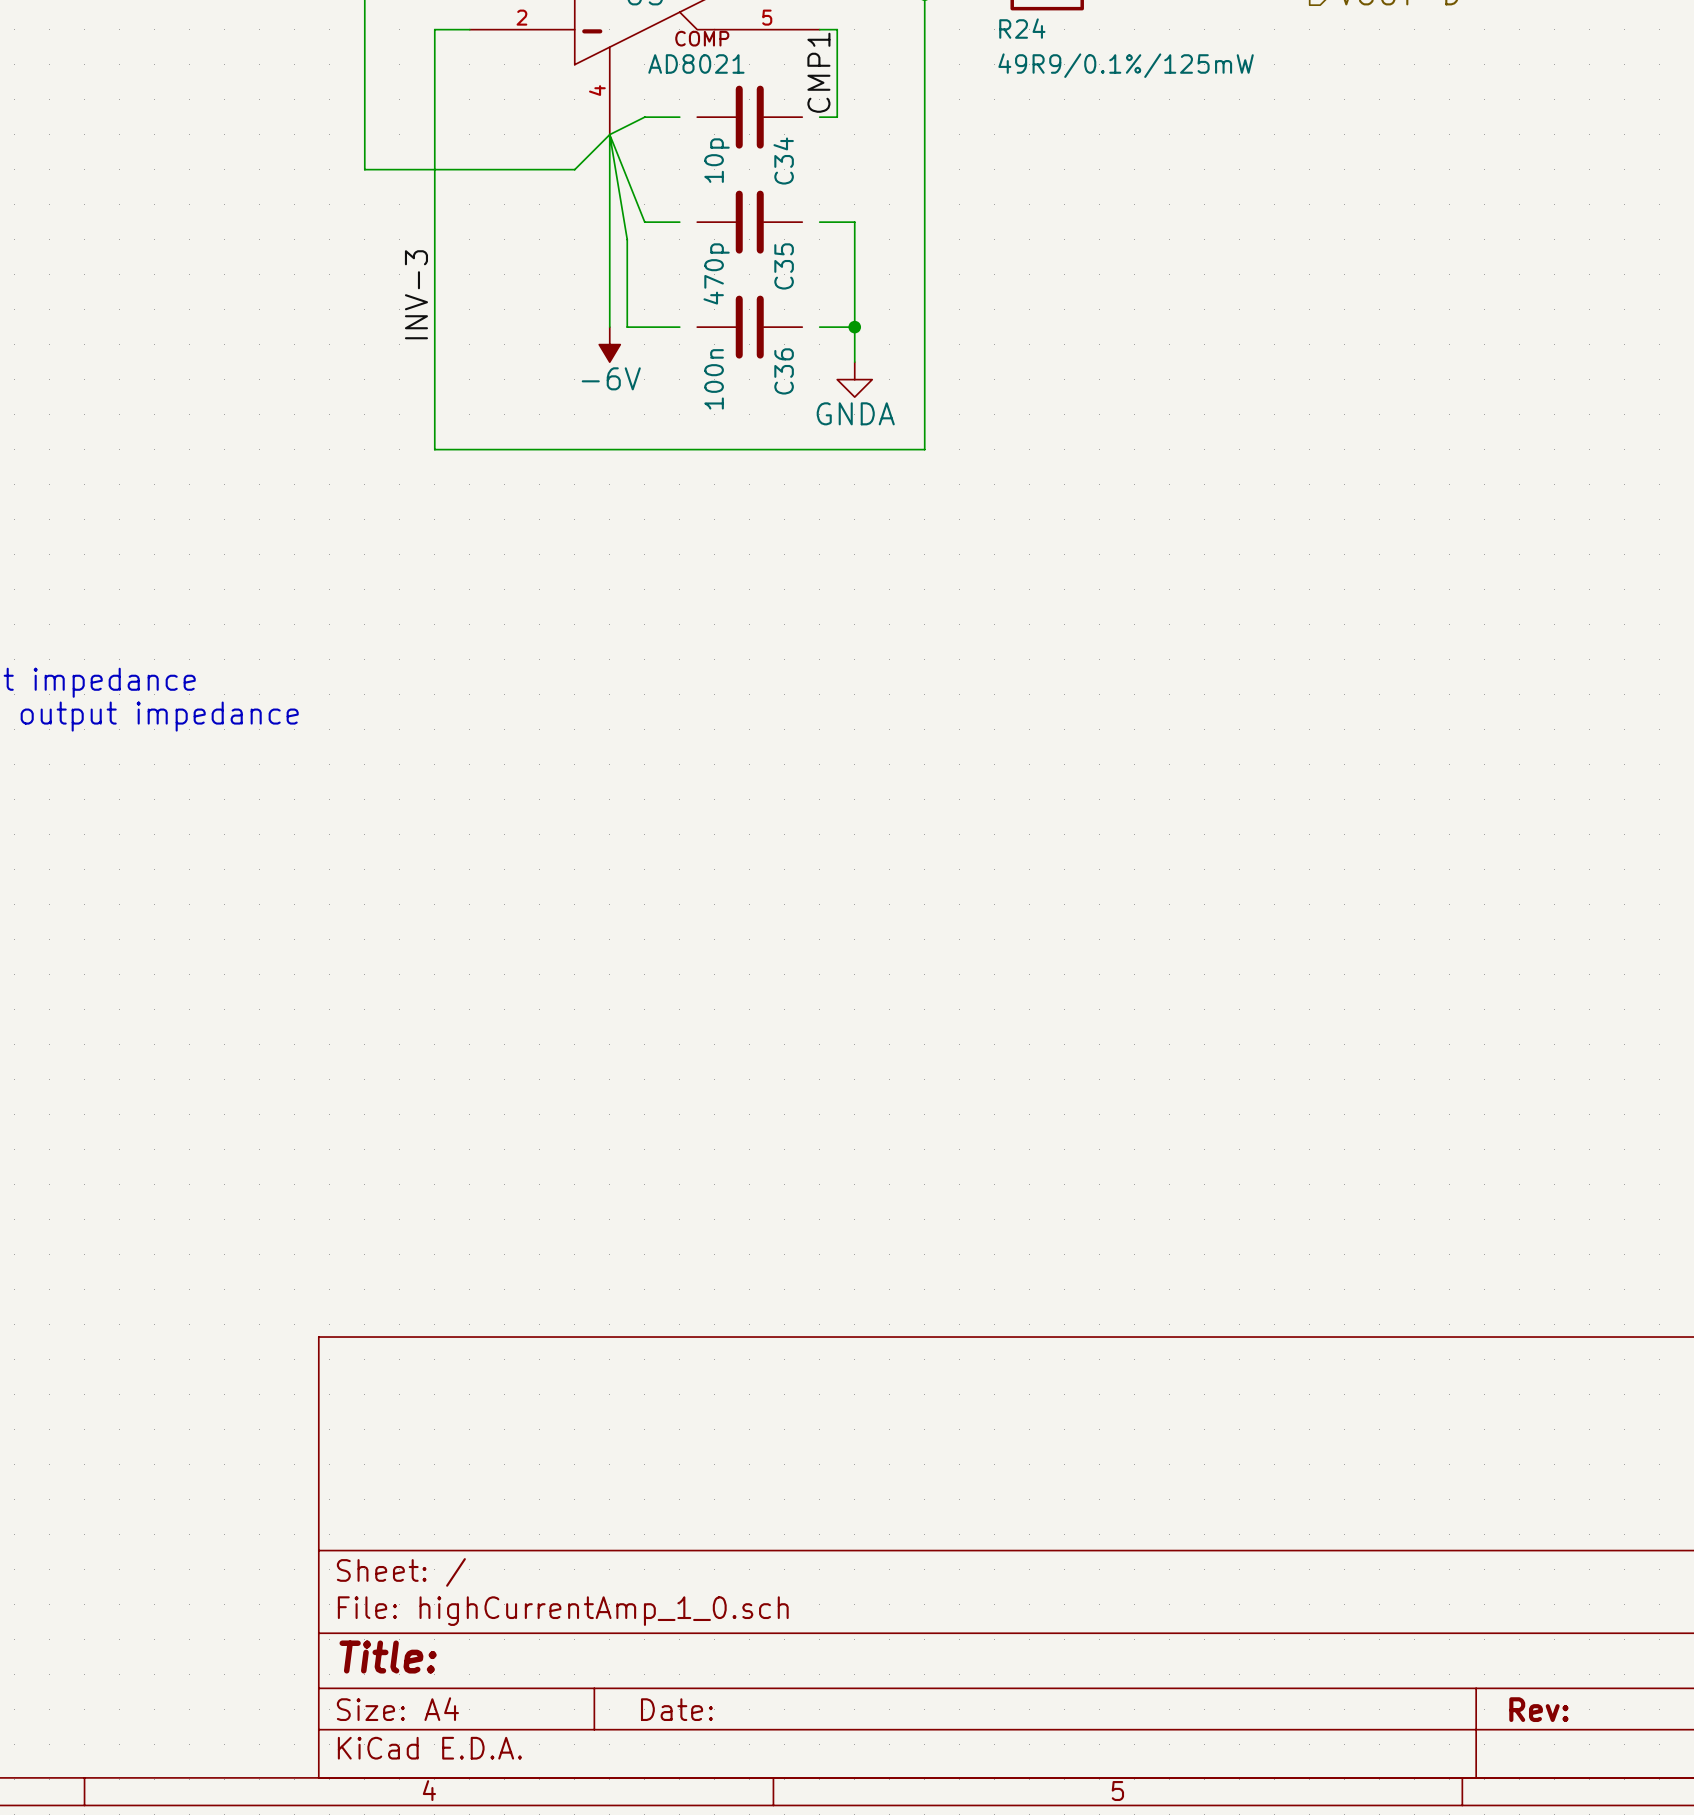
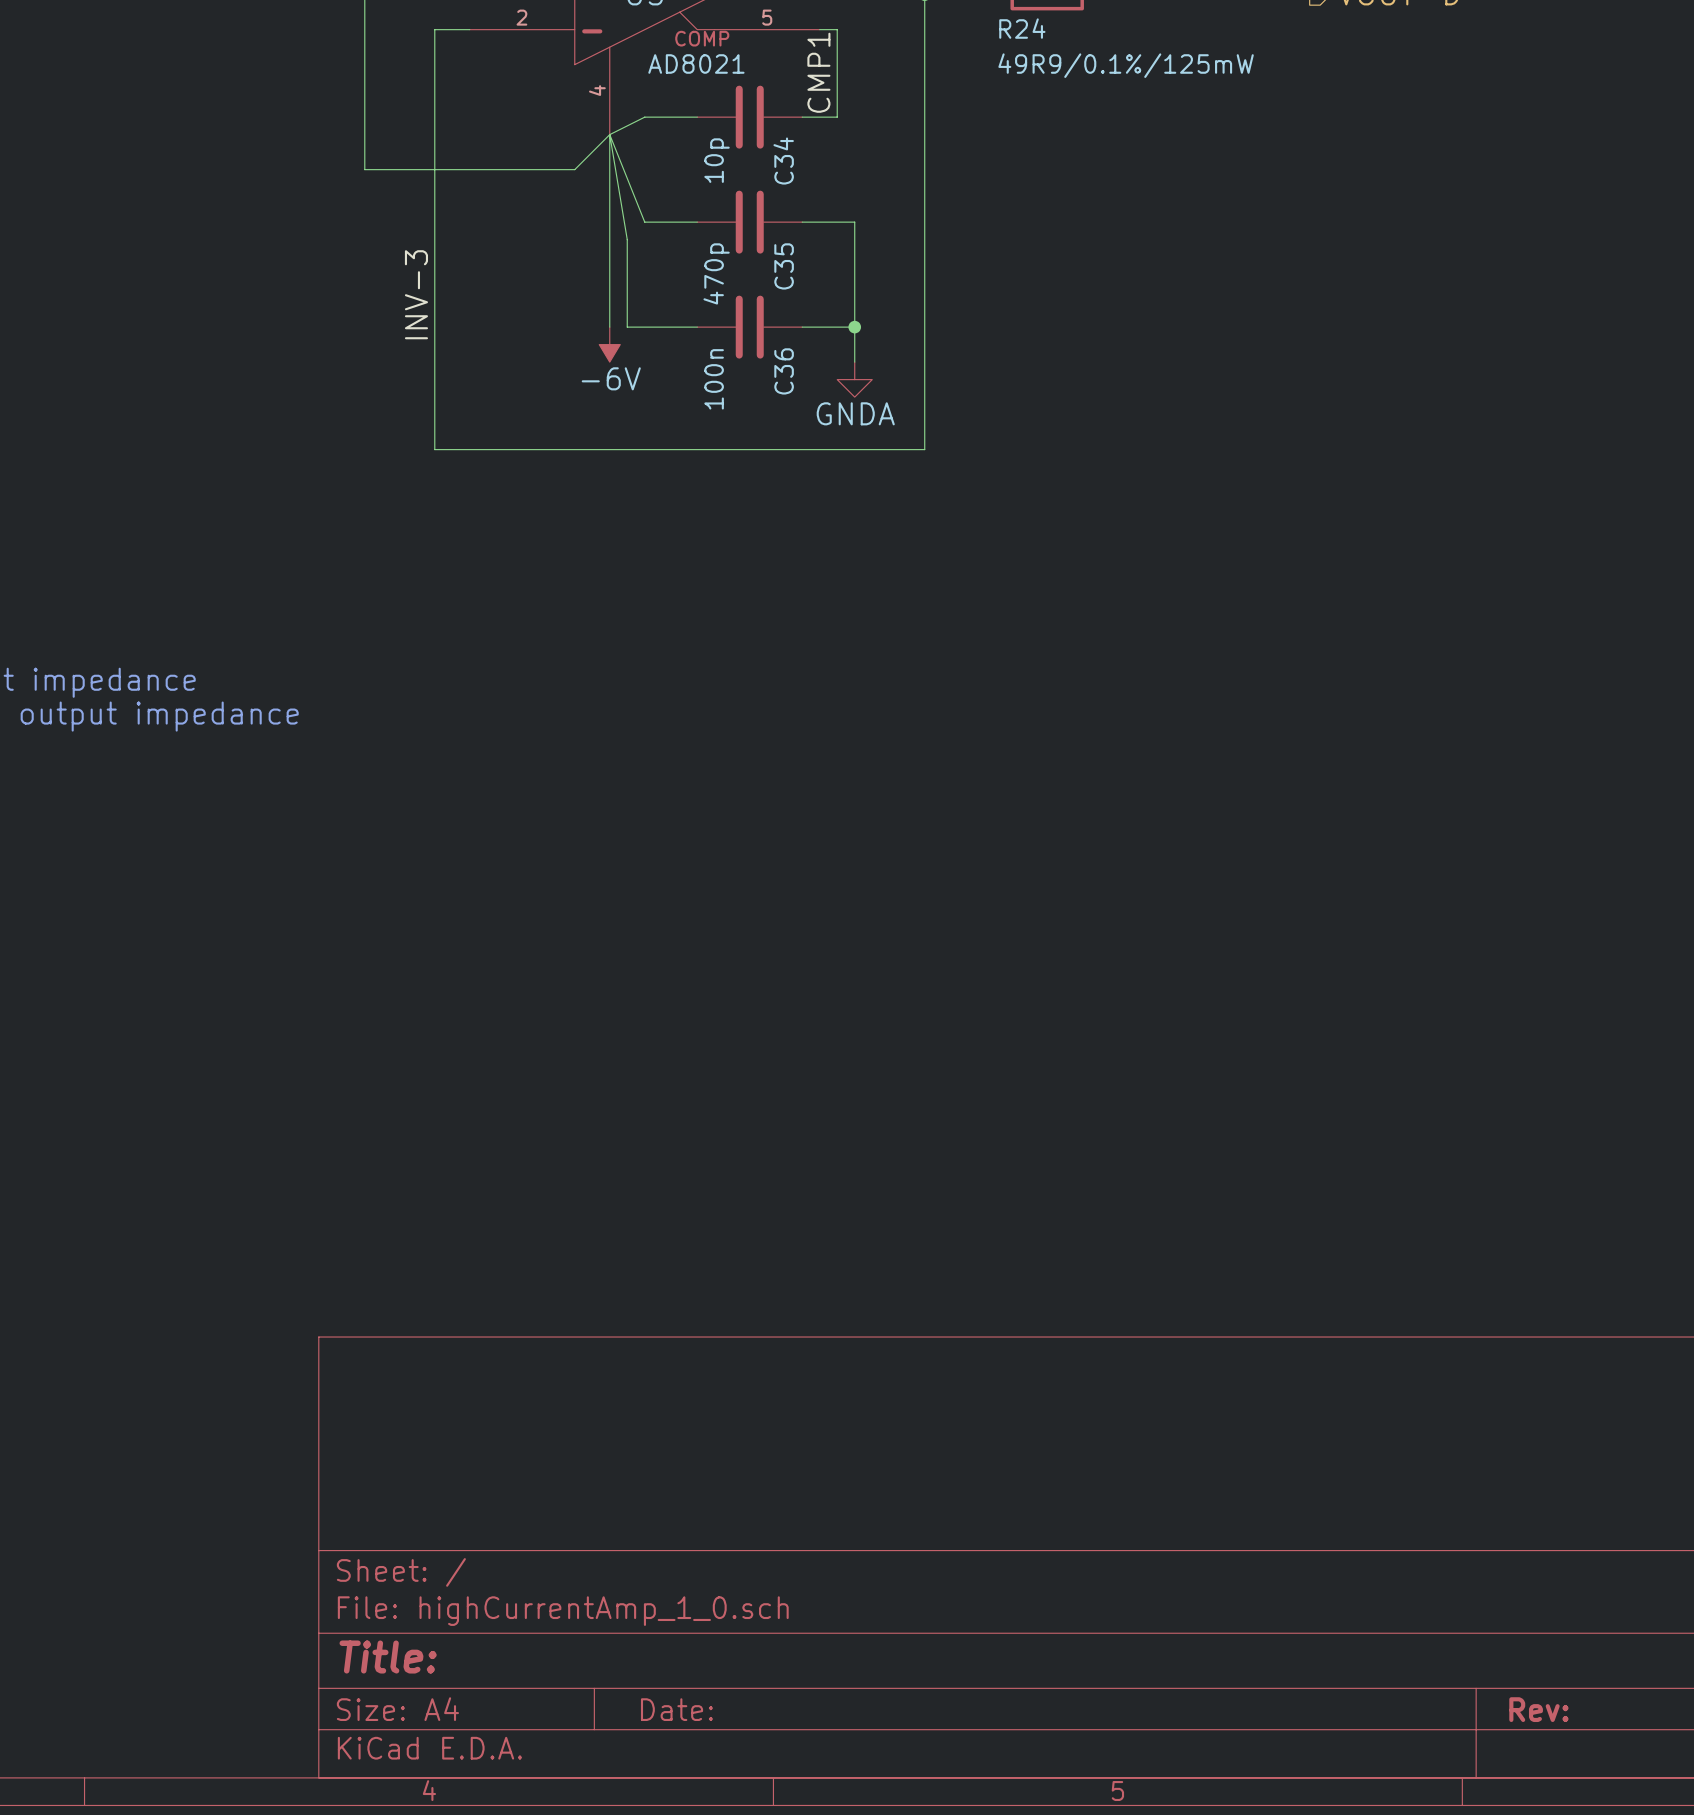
wire: none -> (679, 117) (697, 117)
wire: none -> (802, 117) (819, 117)
wire: none -> (679, 222) (697, 222)
wire: none -> (802, 222) (819, 222)
wire: none -> (679, 327) (697, 327)
wire: none -> (802, 327) (819, 327)

